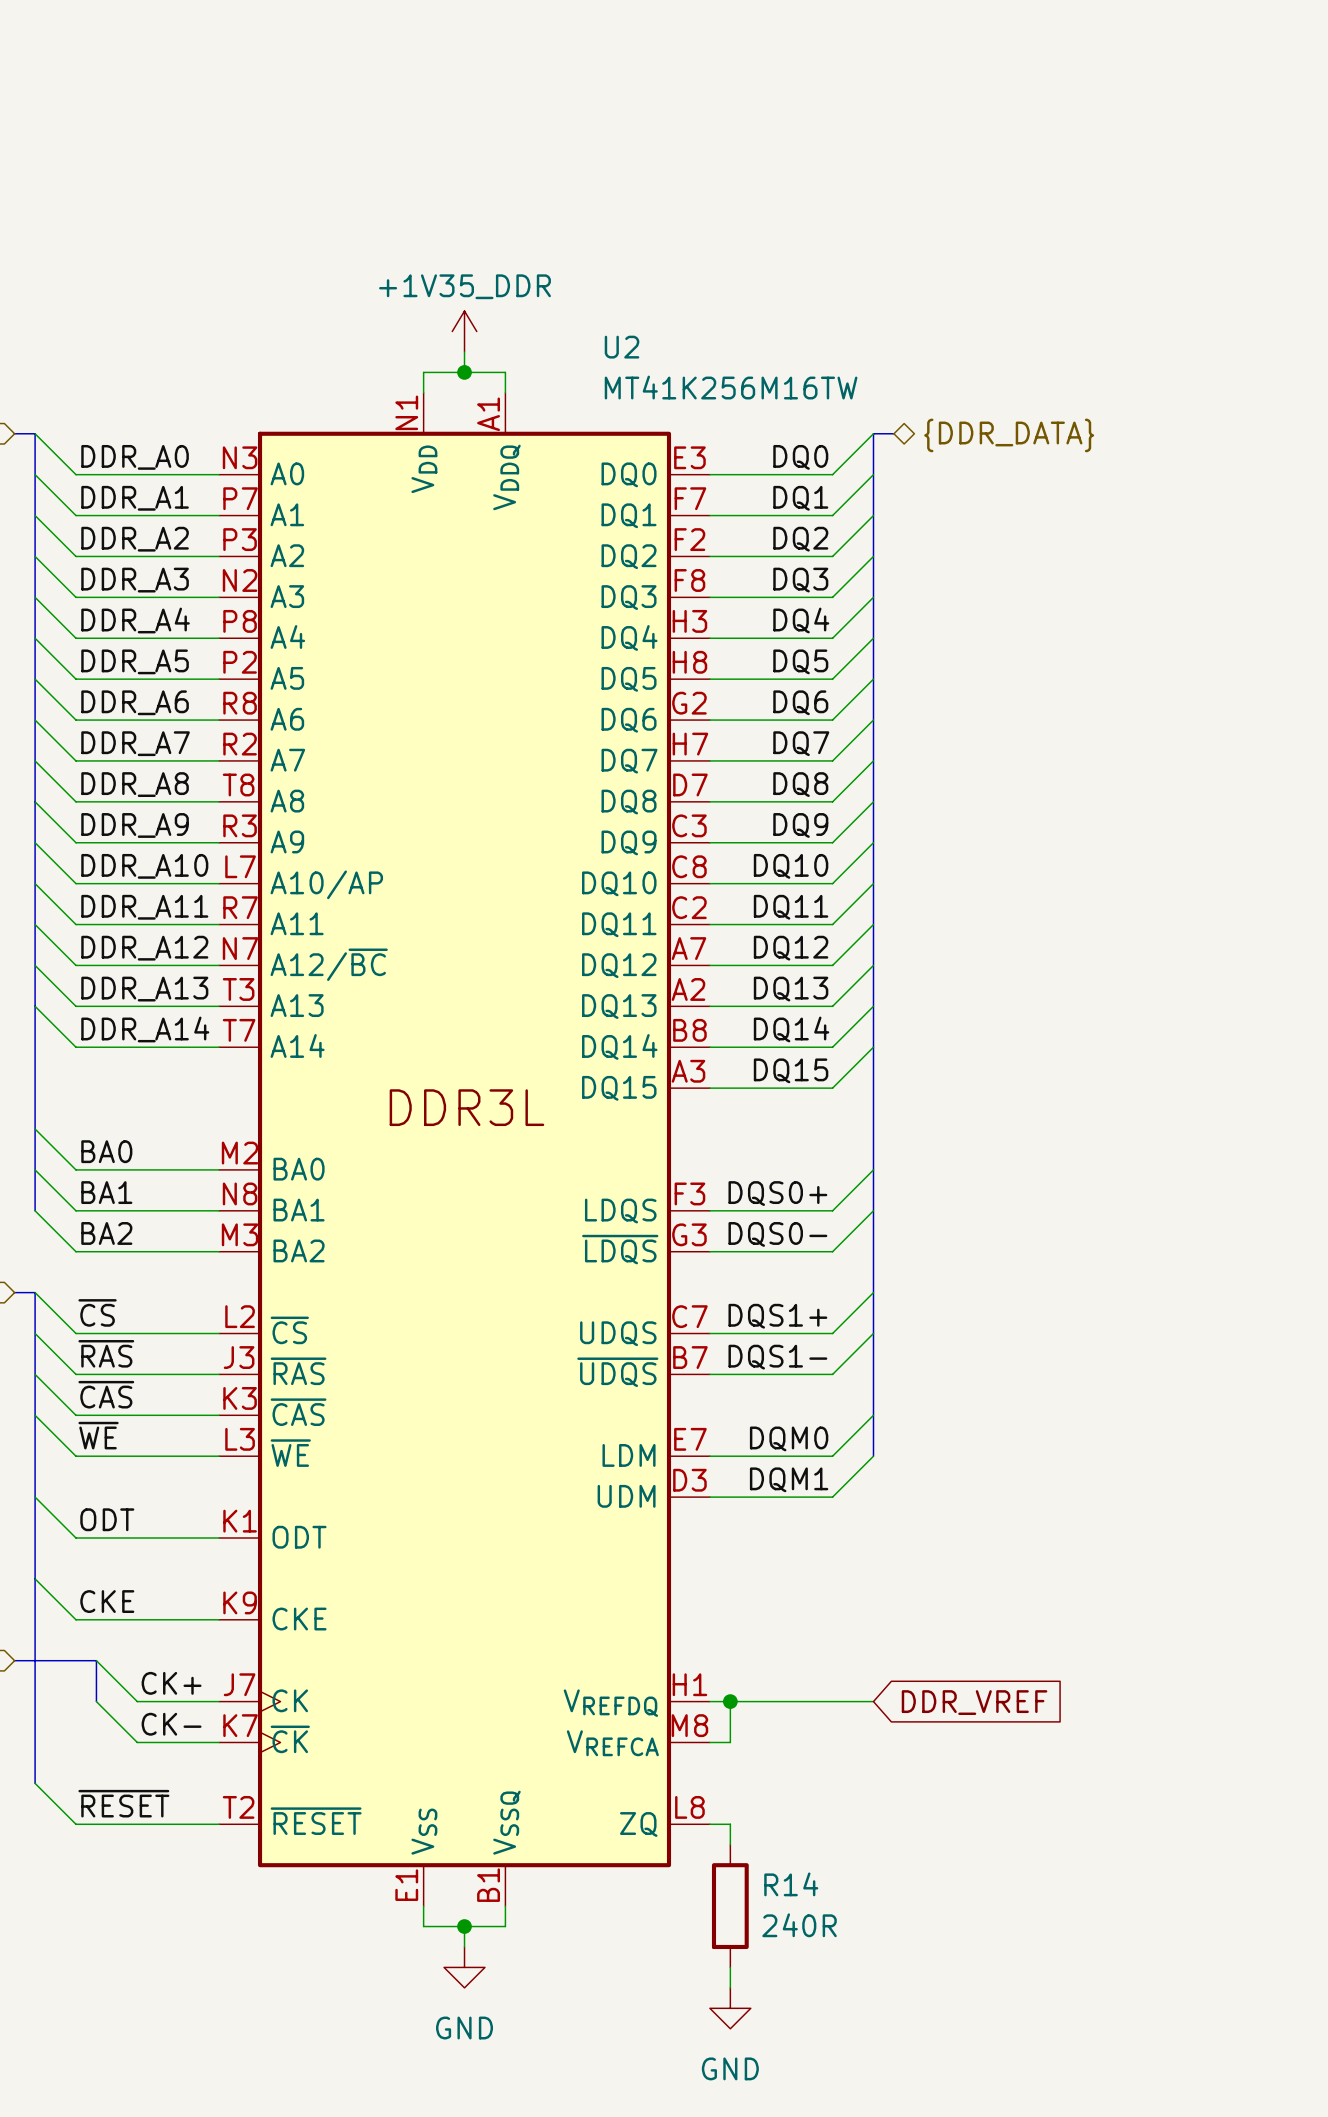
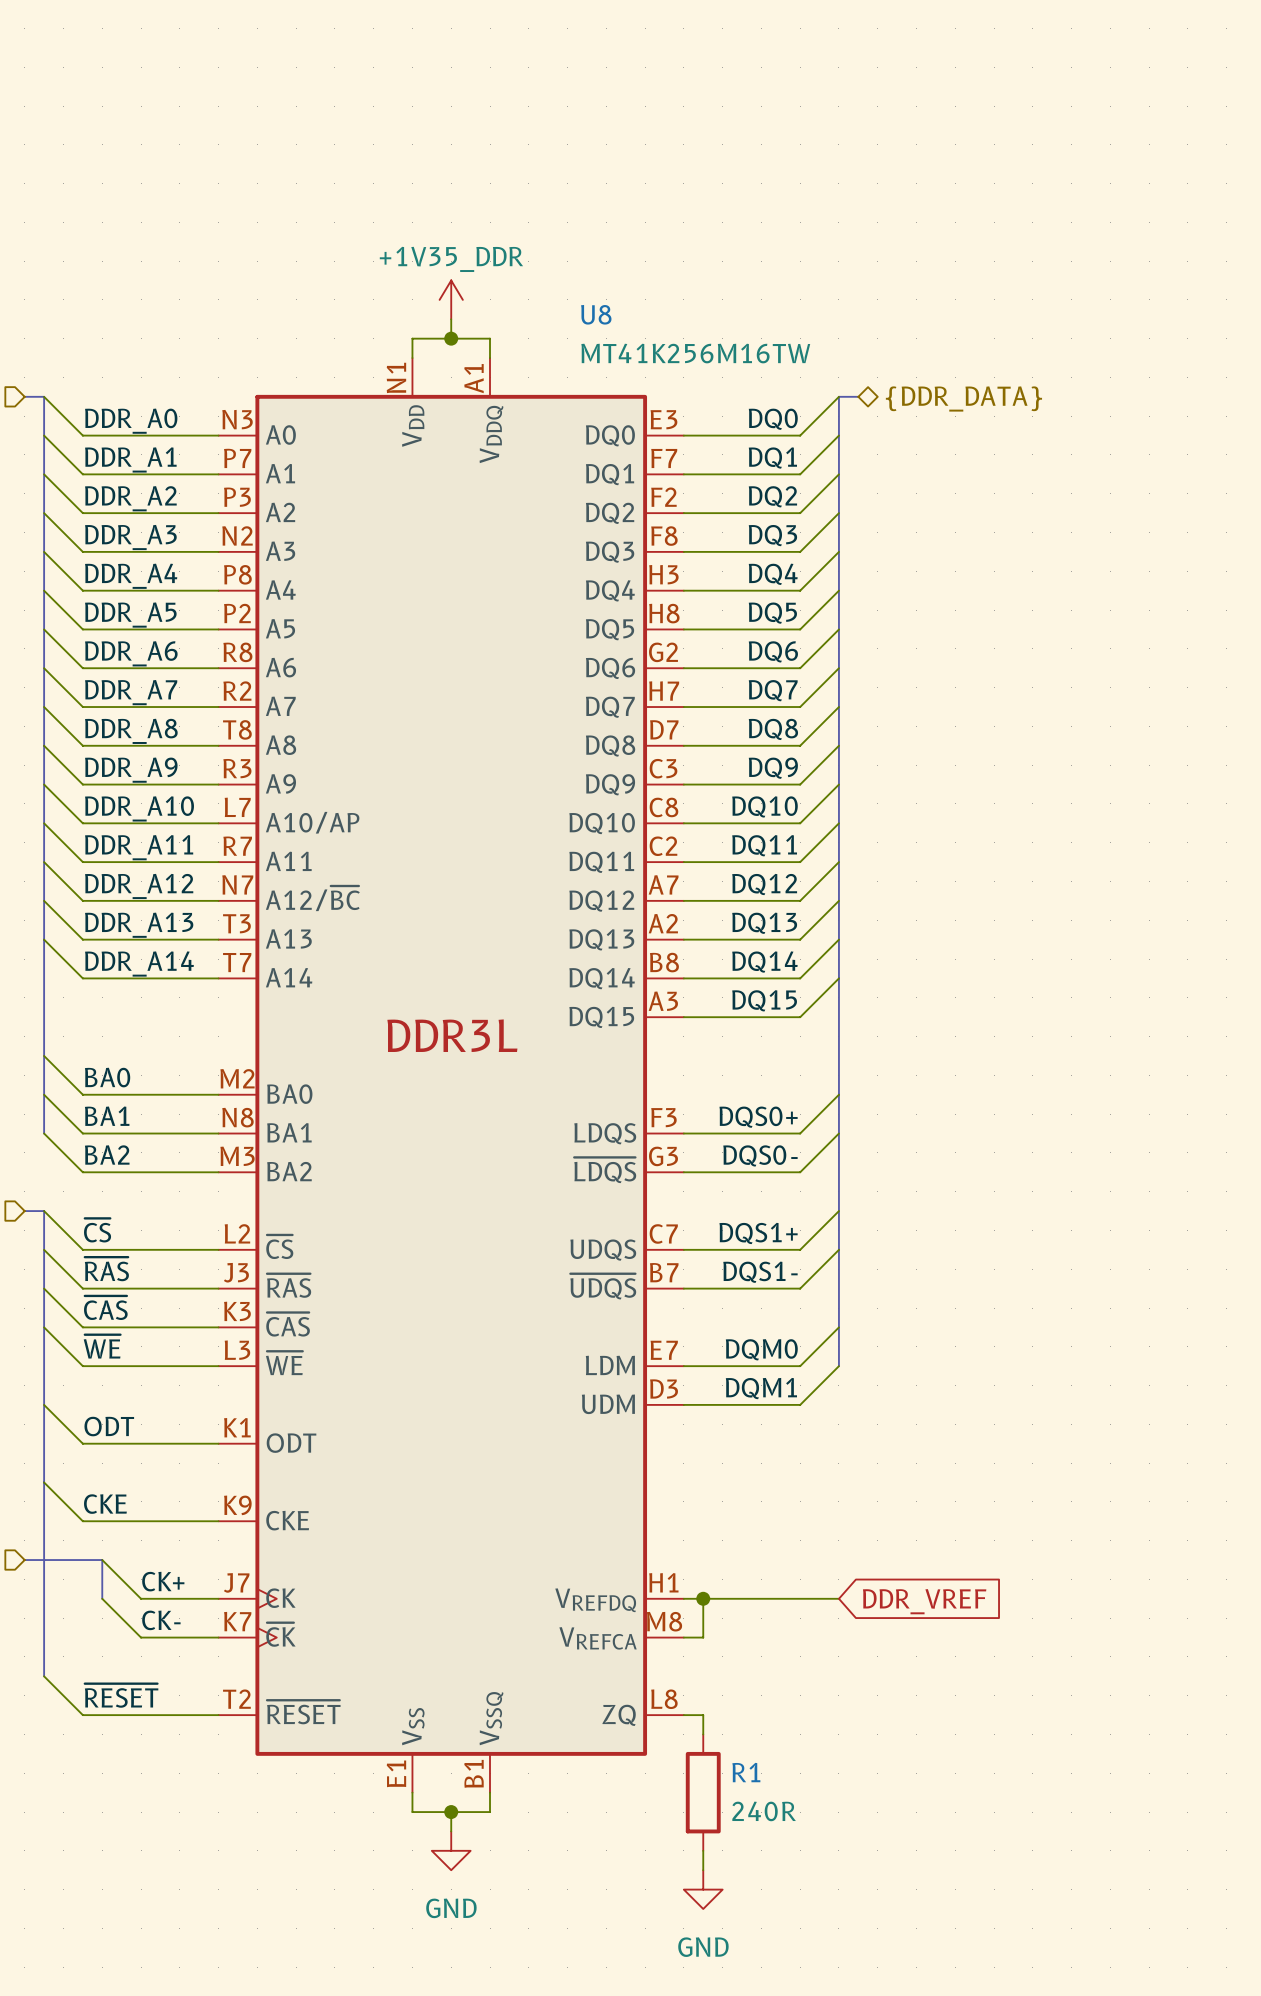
U2 name: U2 (622, 347) -> U8 (596, 314)
R14 name: R14 (791, 1884) -> R1 (746, 1772)

